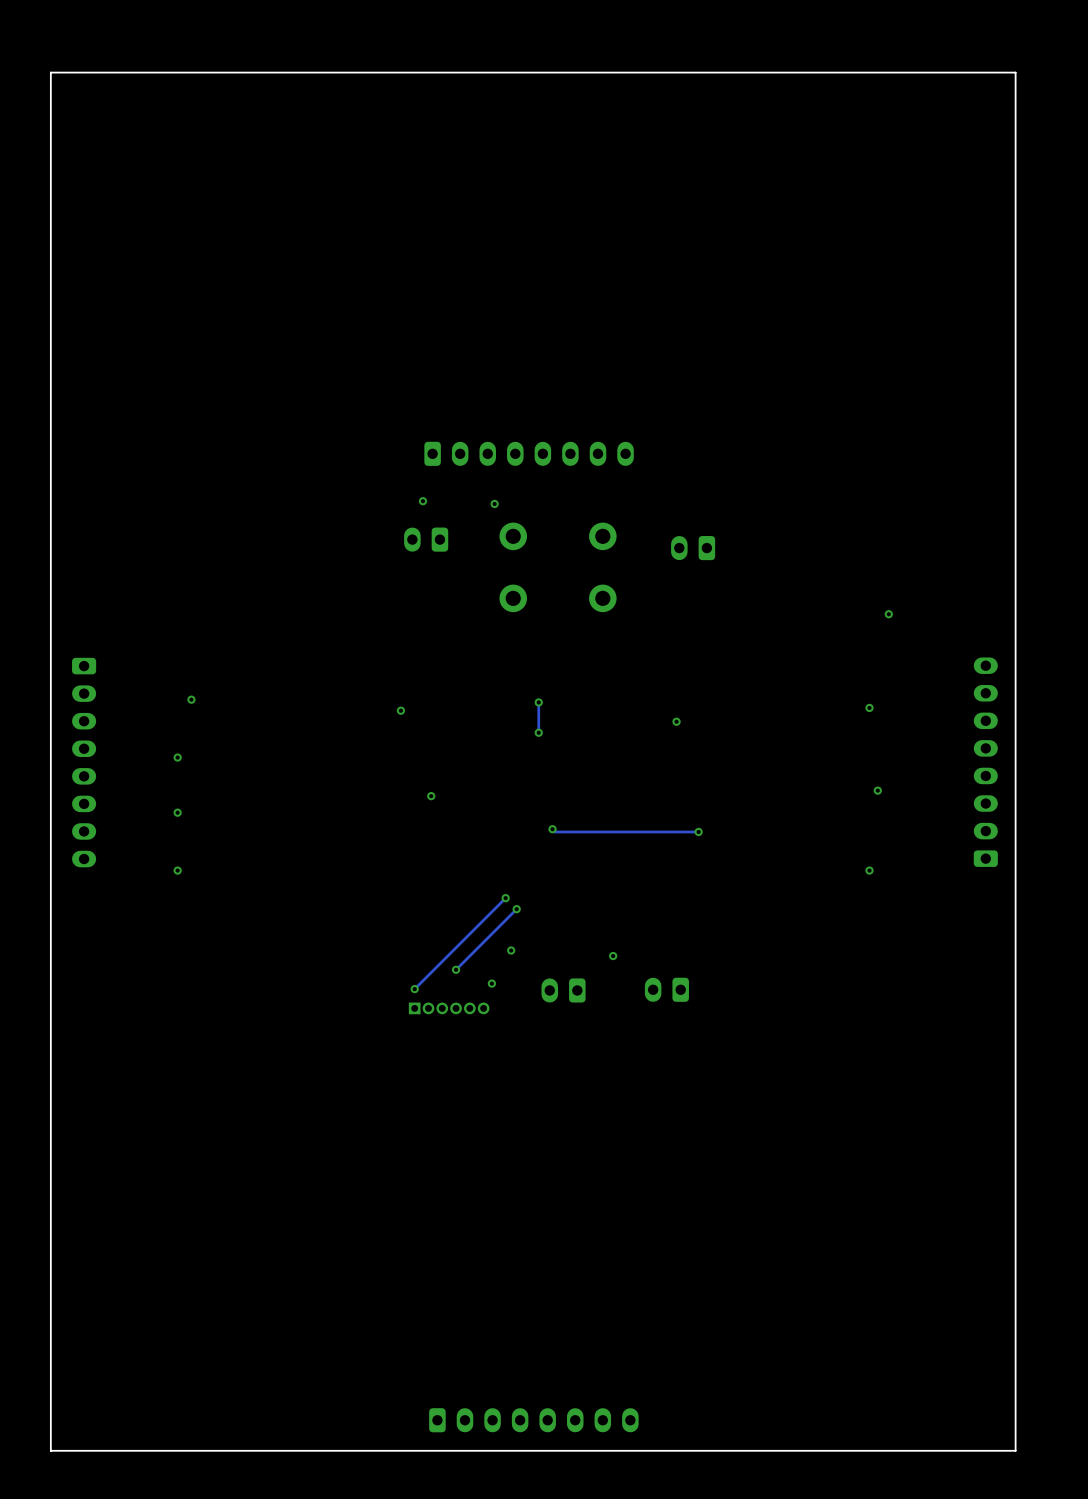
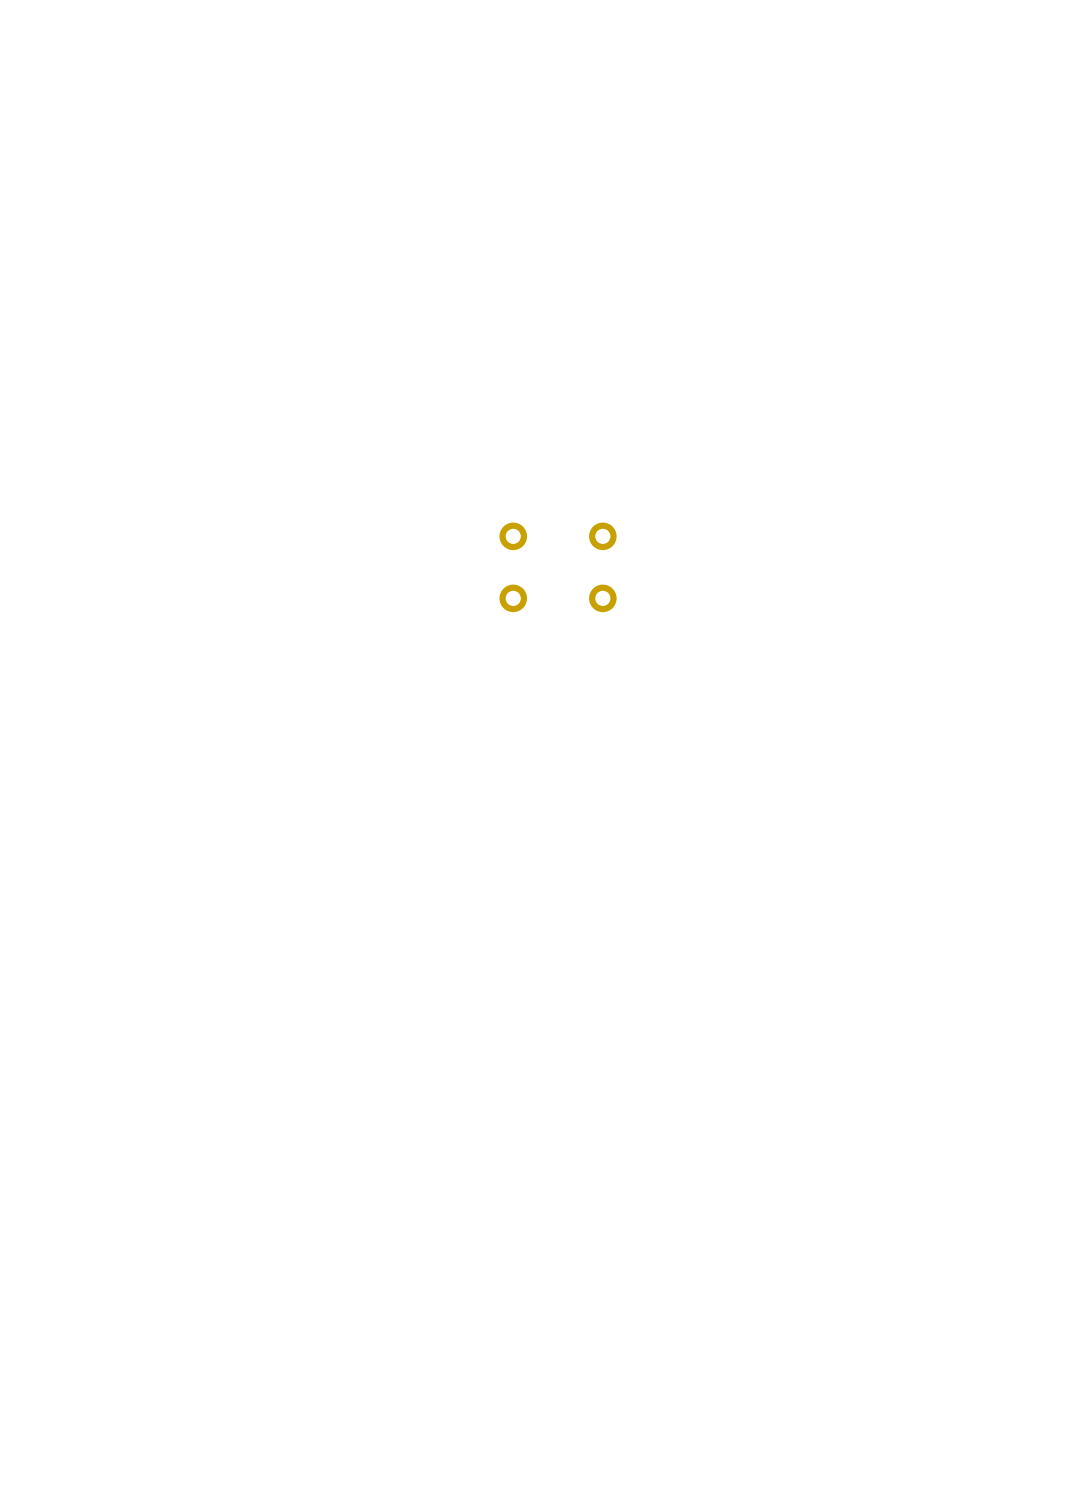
board edge: (1015, 72) (50, 72) (50, 1450) (1015, 1450) (1015, 72) -> none
part: (529, 453) -> none
via: (422, 501) -> none
via: (494, 503) -> none
part: (426, 539) -> none
part: (693, 548) -> none
via: (888, 614) -> none
via: (191, 699) -> none
track: (538, 702) (538, 732) -> none
via: (538, 702) -> none
via: (869, 707) -> none
via: (400, 710) -> none
via: (676, 721) -> none
via: (538, 732) -> none
via: (177, 757) -> none
part: (84, 762) -> none
part: (985, 762) -> none
via: (877, 790) -> none
via: (431, 796) -> none
via: (177, 812) -> none
track: (552, 829) (555, 831) (698, 831) -> none
via: (552, 829) -> none
via: (698, 831) -> none
via: (177, 870) -> none
via: (869, 870) -> none
track: (505, 898) (414, 989) -> none
via: (505, 898) -> none
track: (516, 909) (456, 969) -> none
via: (516, 909) -> none
via: (511, 950) -> none
via: (613, 956) -> none
via: (456, 969) -> none
via: (491, 983) -> none
via: (414, 989) -> none
part: (666, 989) -> none
part: (563, 990) -> none
part: (449, 1008) -> none
part: (533, 1420) -> none

